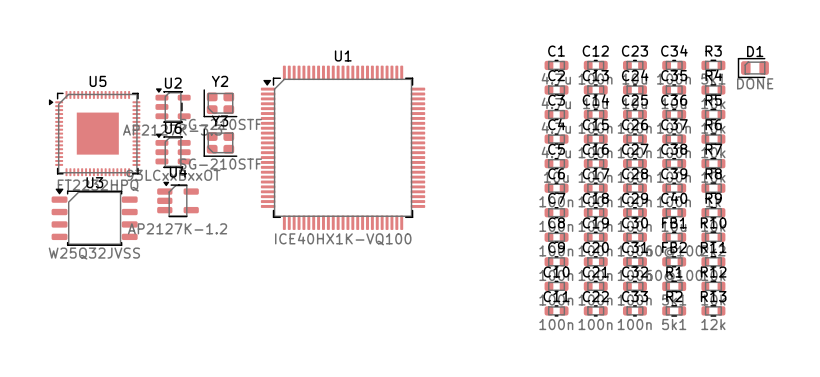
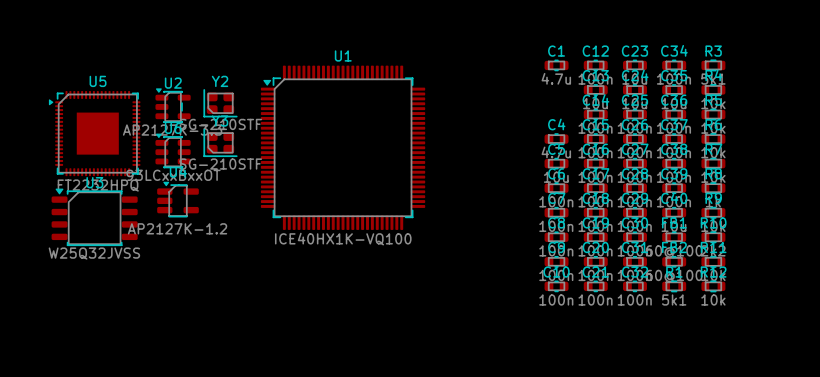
D1: DONE (753, 68) -> none
C2: 4.7u (556, 89) -> none
C3: 4.7u (556, 114) -> none
C11: 100n (556, 310) -> none
C22: 100n (595, 310) -> none
C33: 100n (634, 310) -> none
R2: 5k1 (674, 310) -> none
R13: 12k (713, 310) -> none

